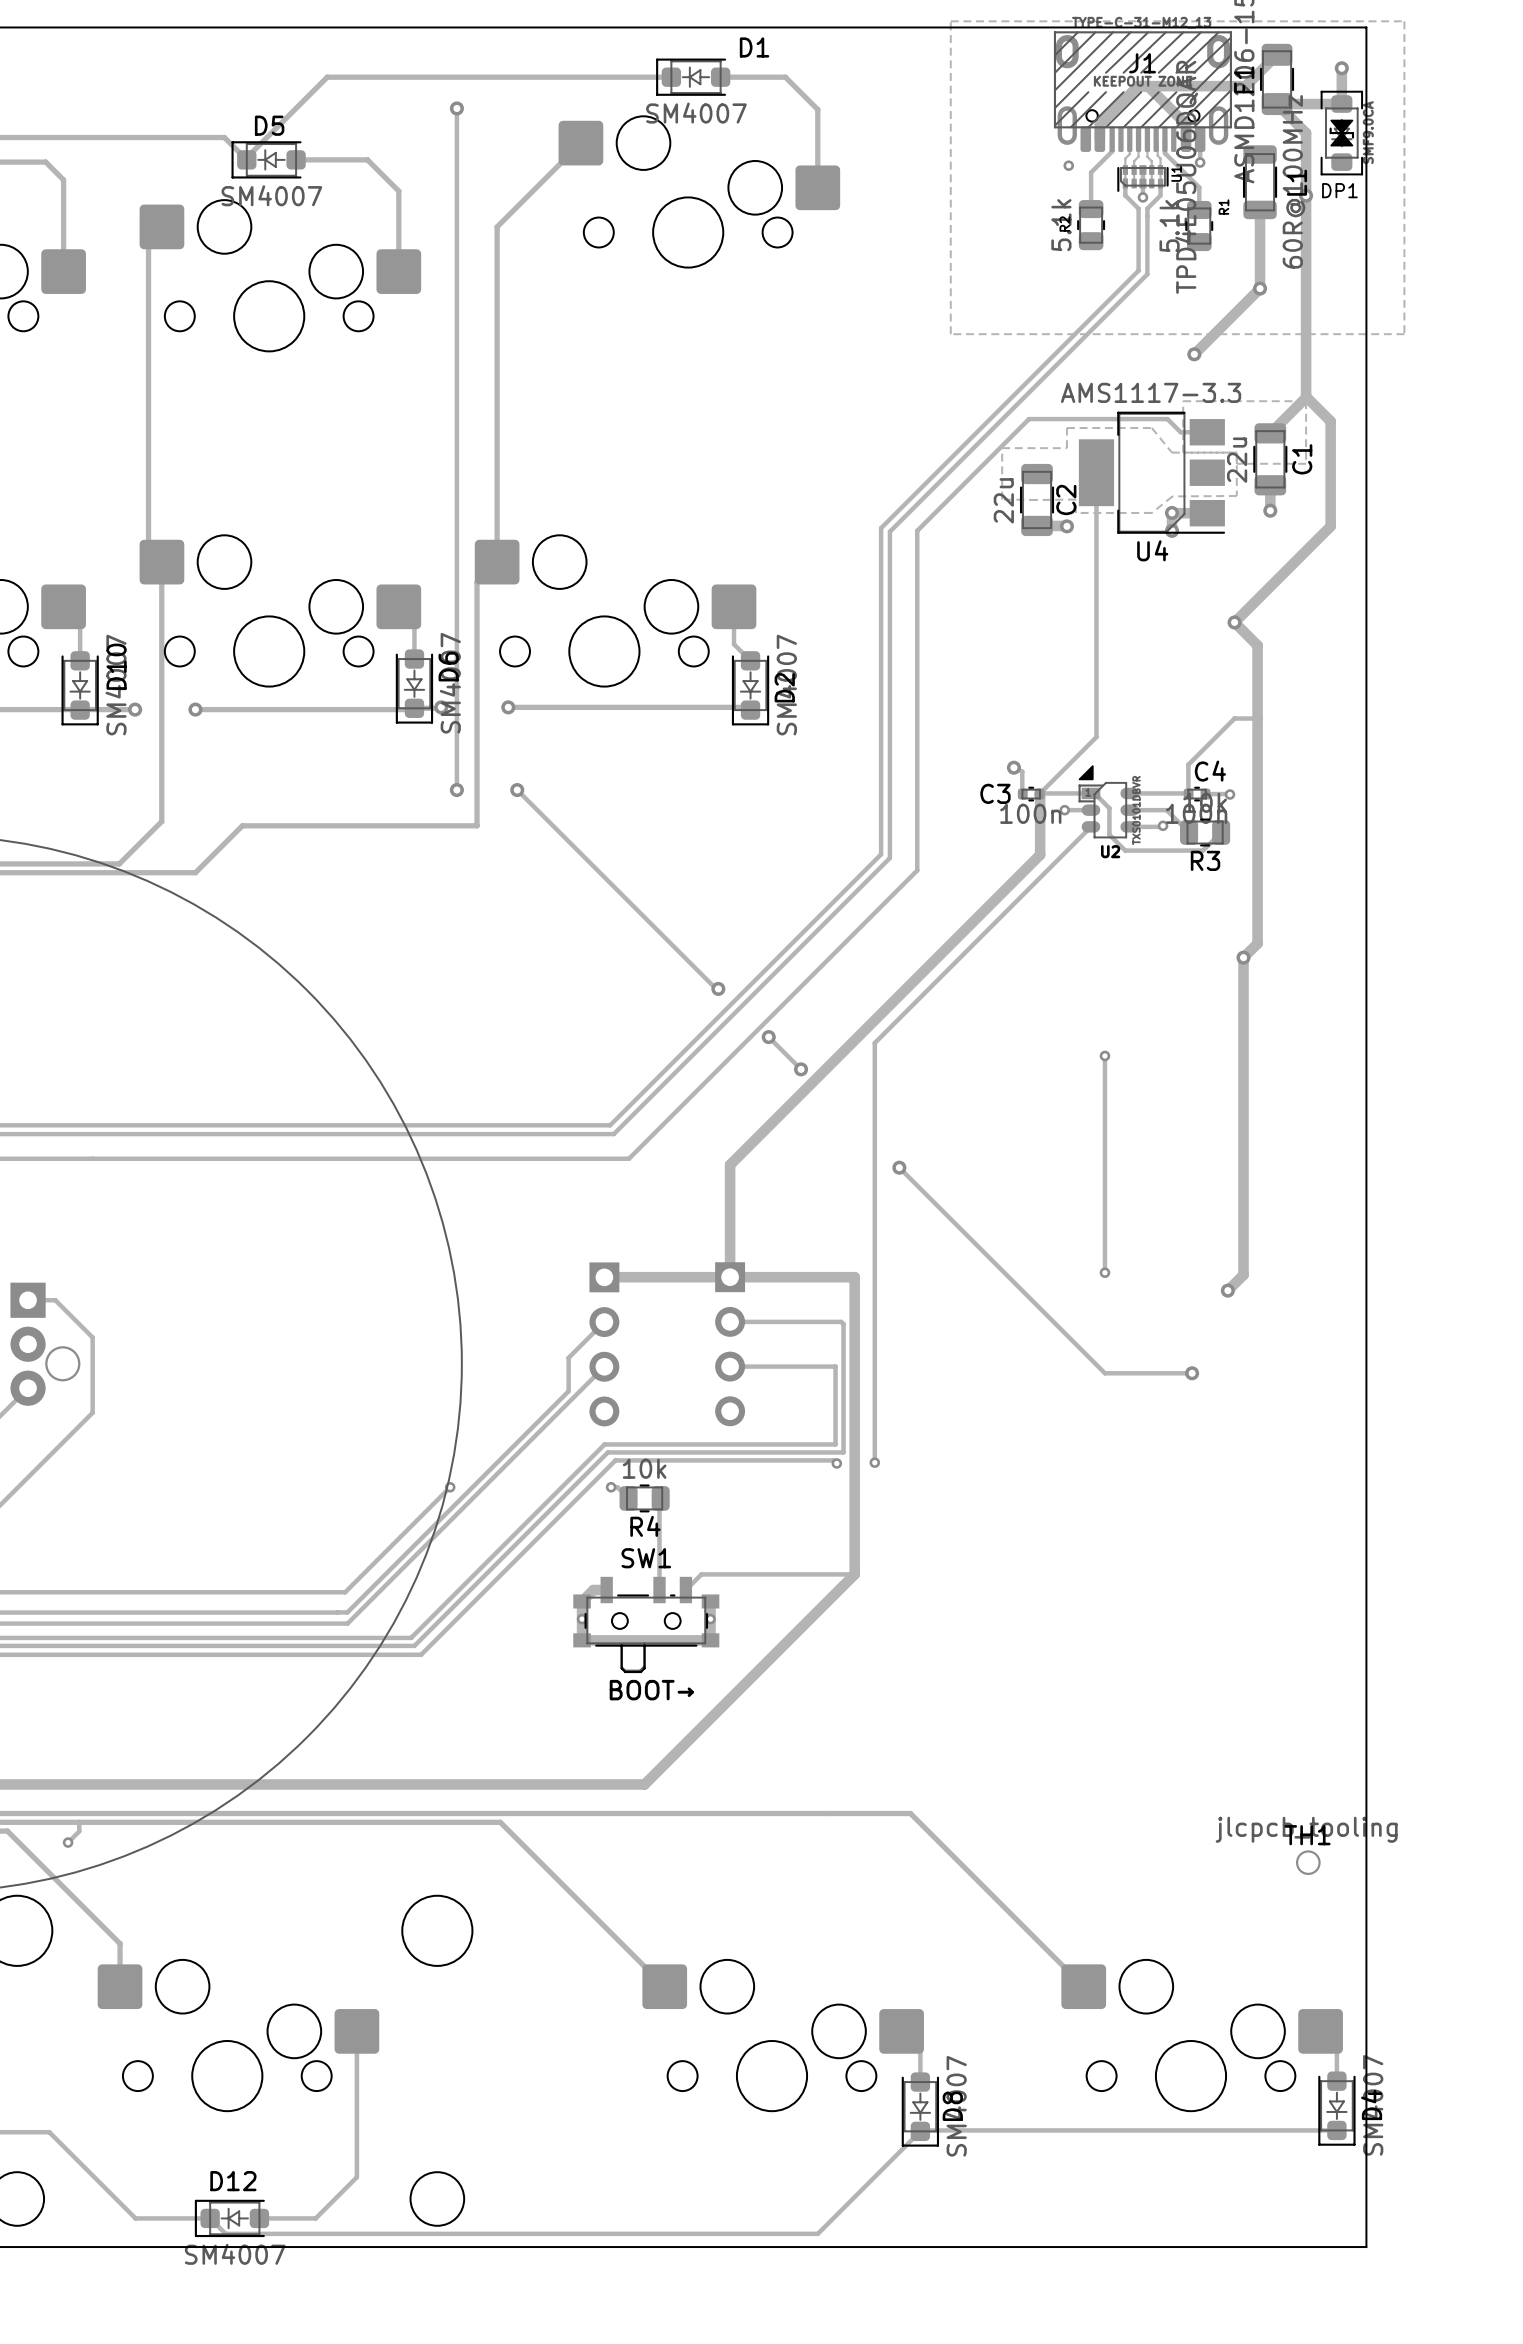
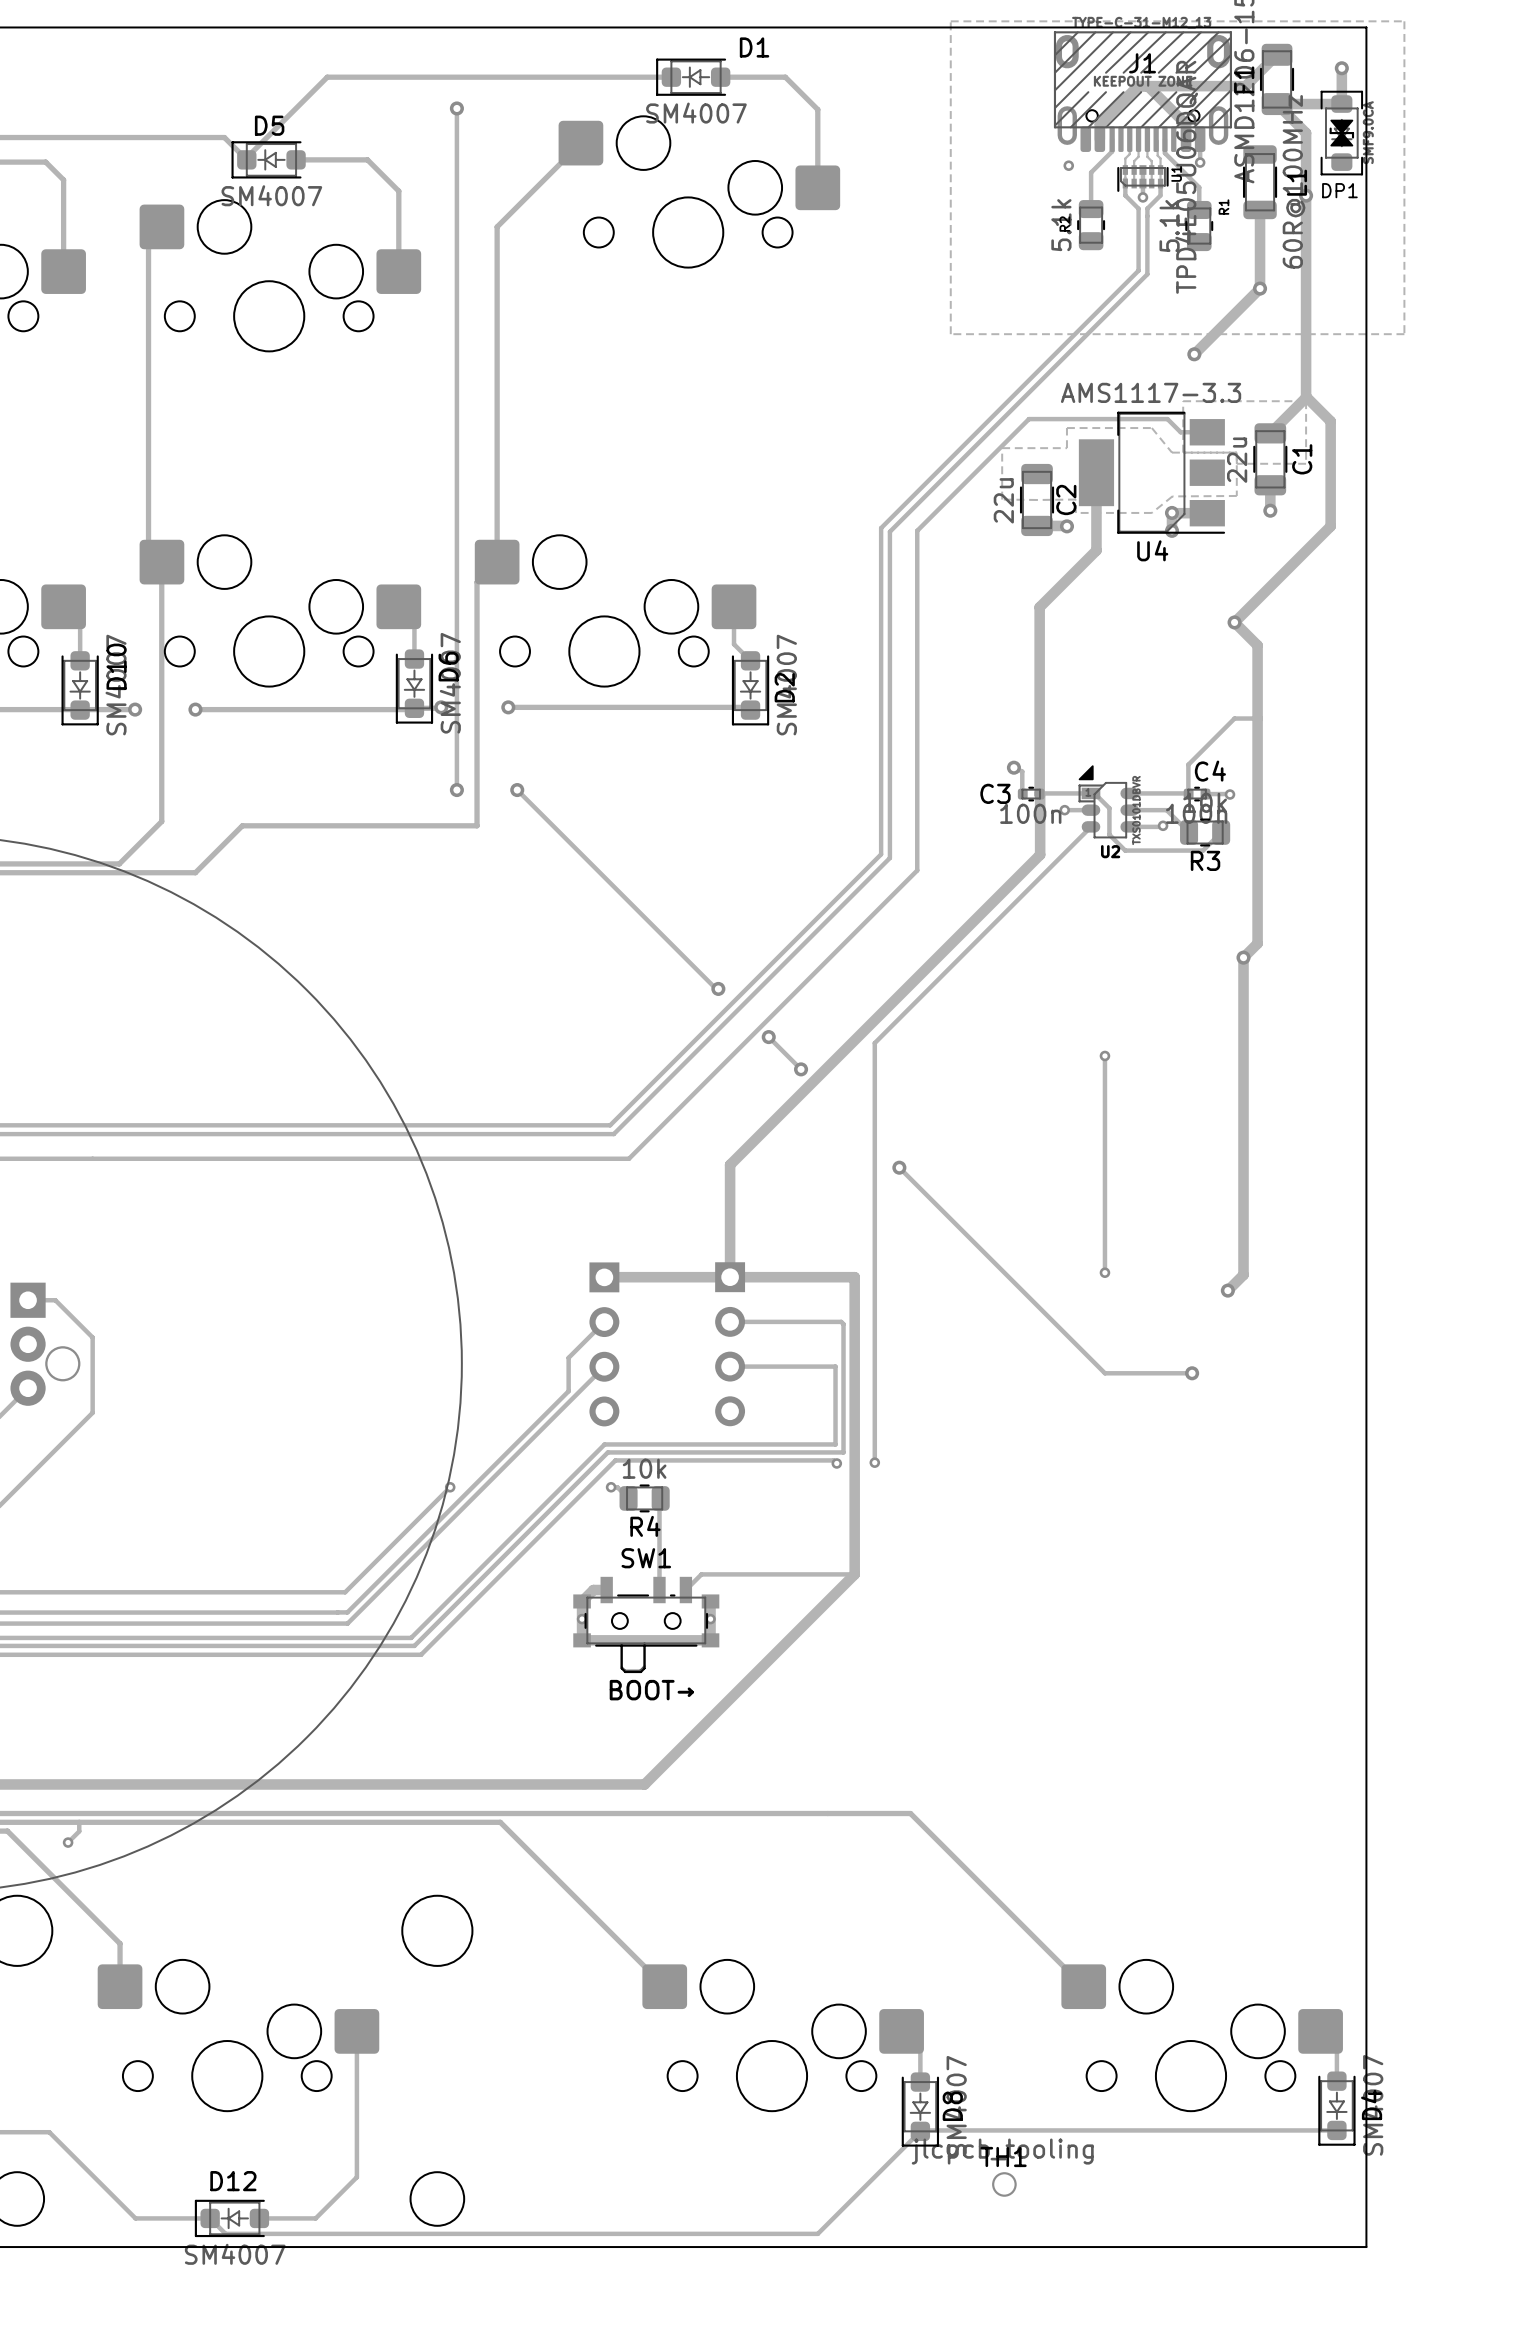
track width: thin (1096, 472) (1096, 550) -> thick (1096, 472) (1096, 550)
track: (1096, 550) (1096, 737) (1039, 794) -> (1096, 550) (1039, 607) (1039, 794)
TH1 position: (1308, 1862) -> (1004, 2184)

